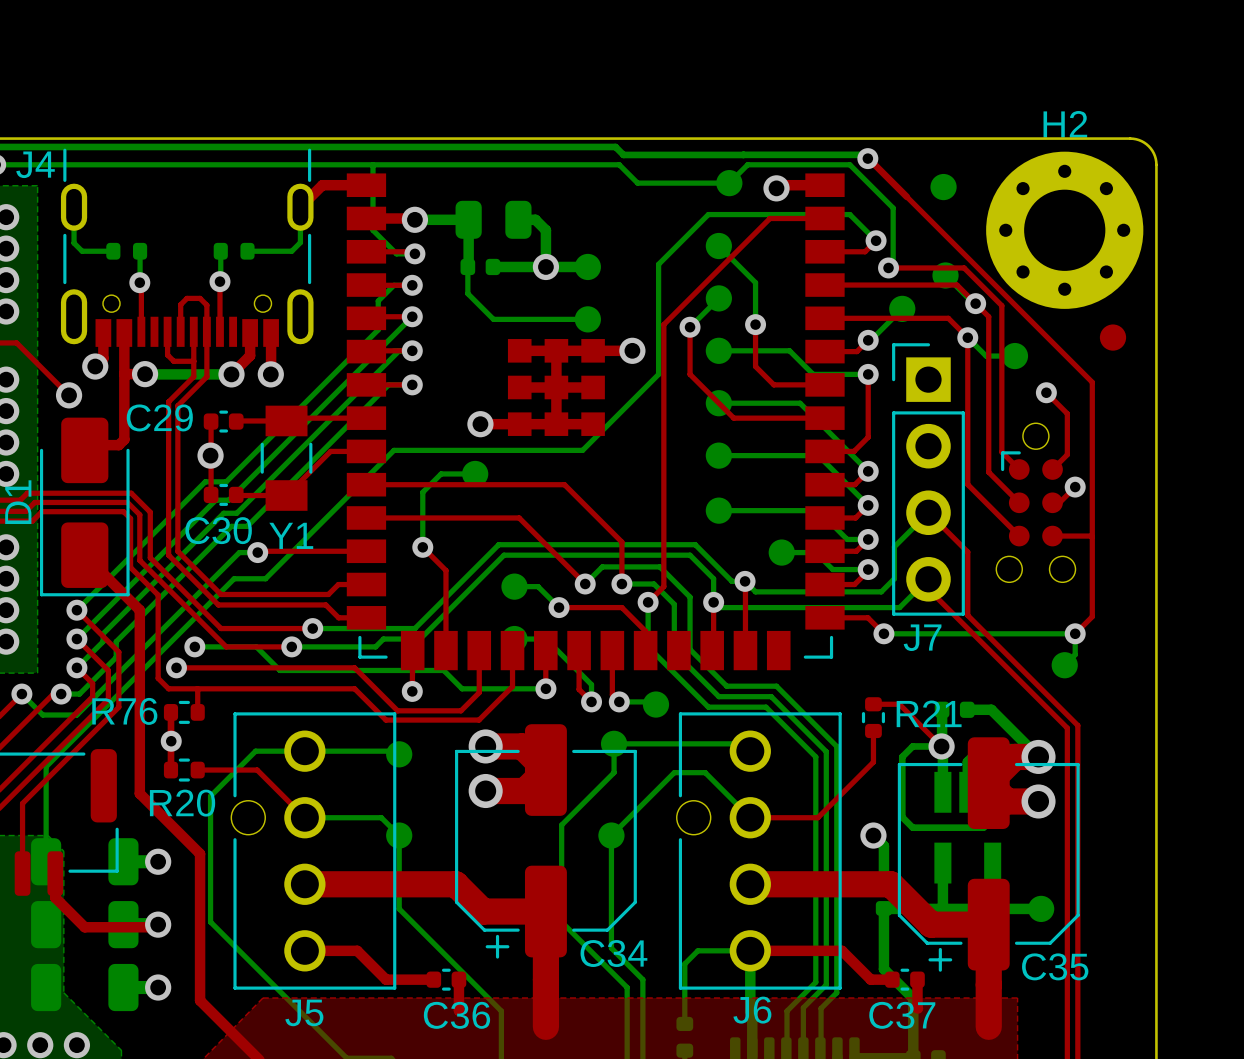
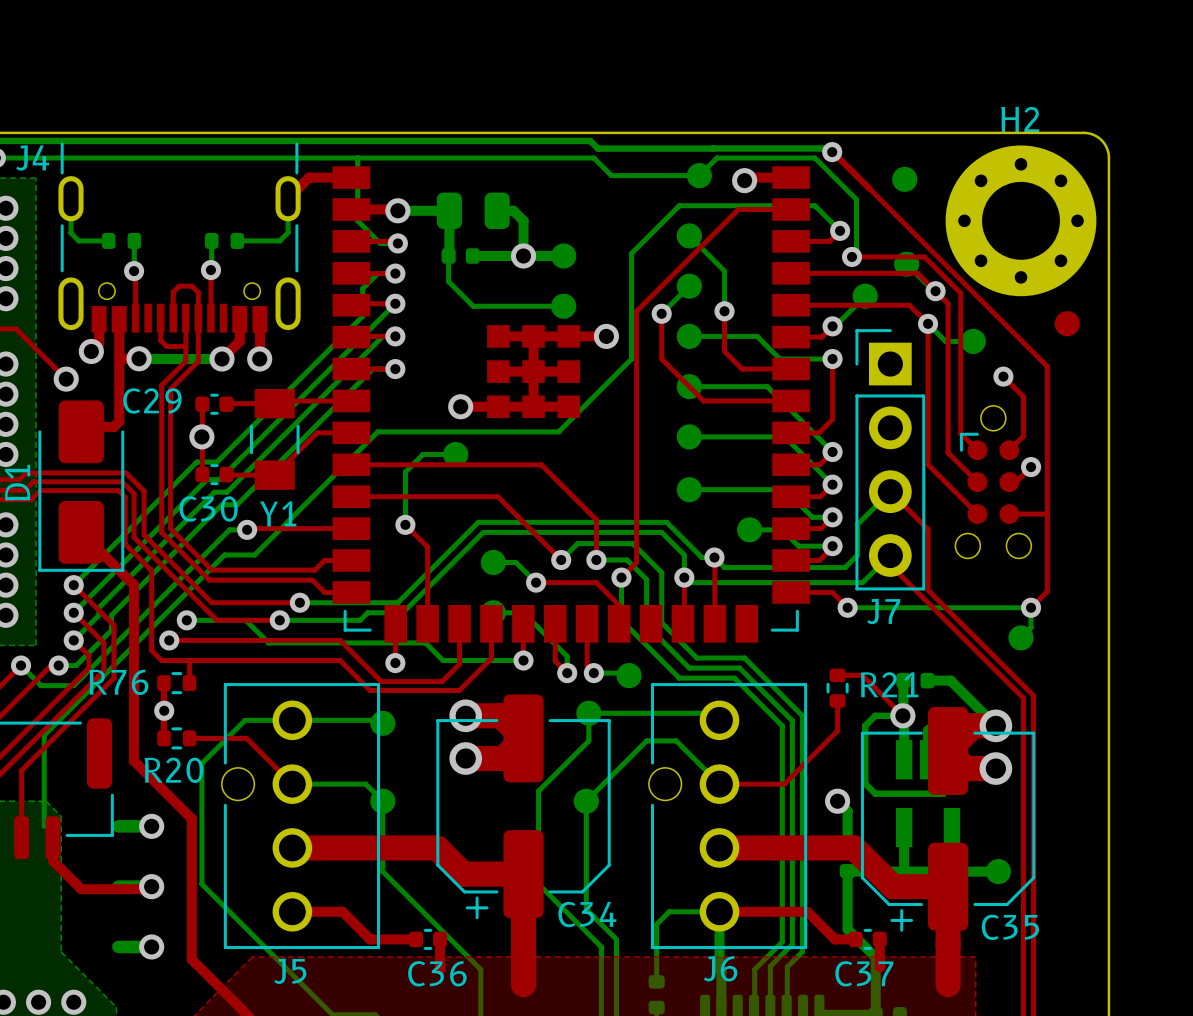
part: (84, 861) -> none
part: (84, 924) -> none
part: (84, 987) -> none

